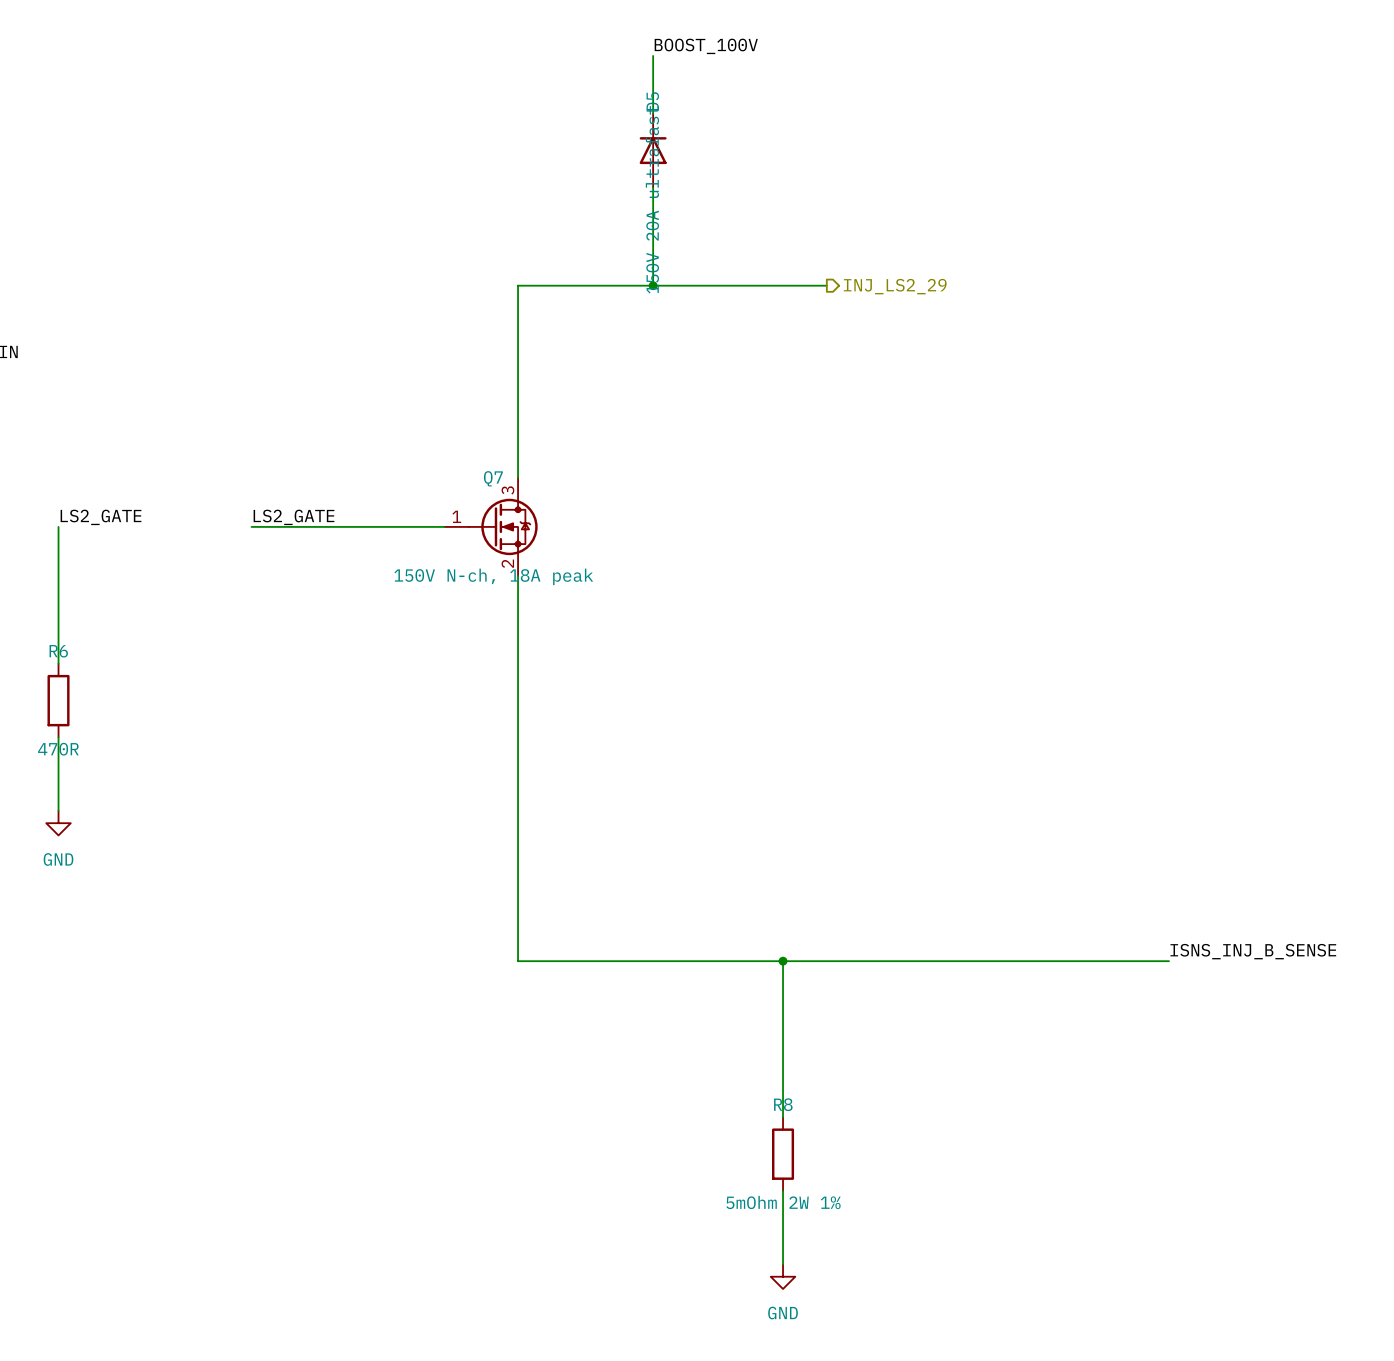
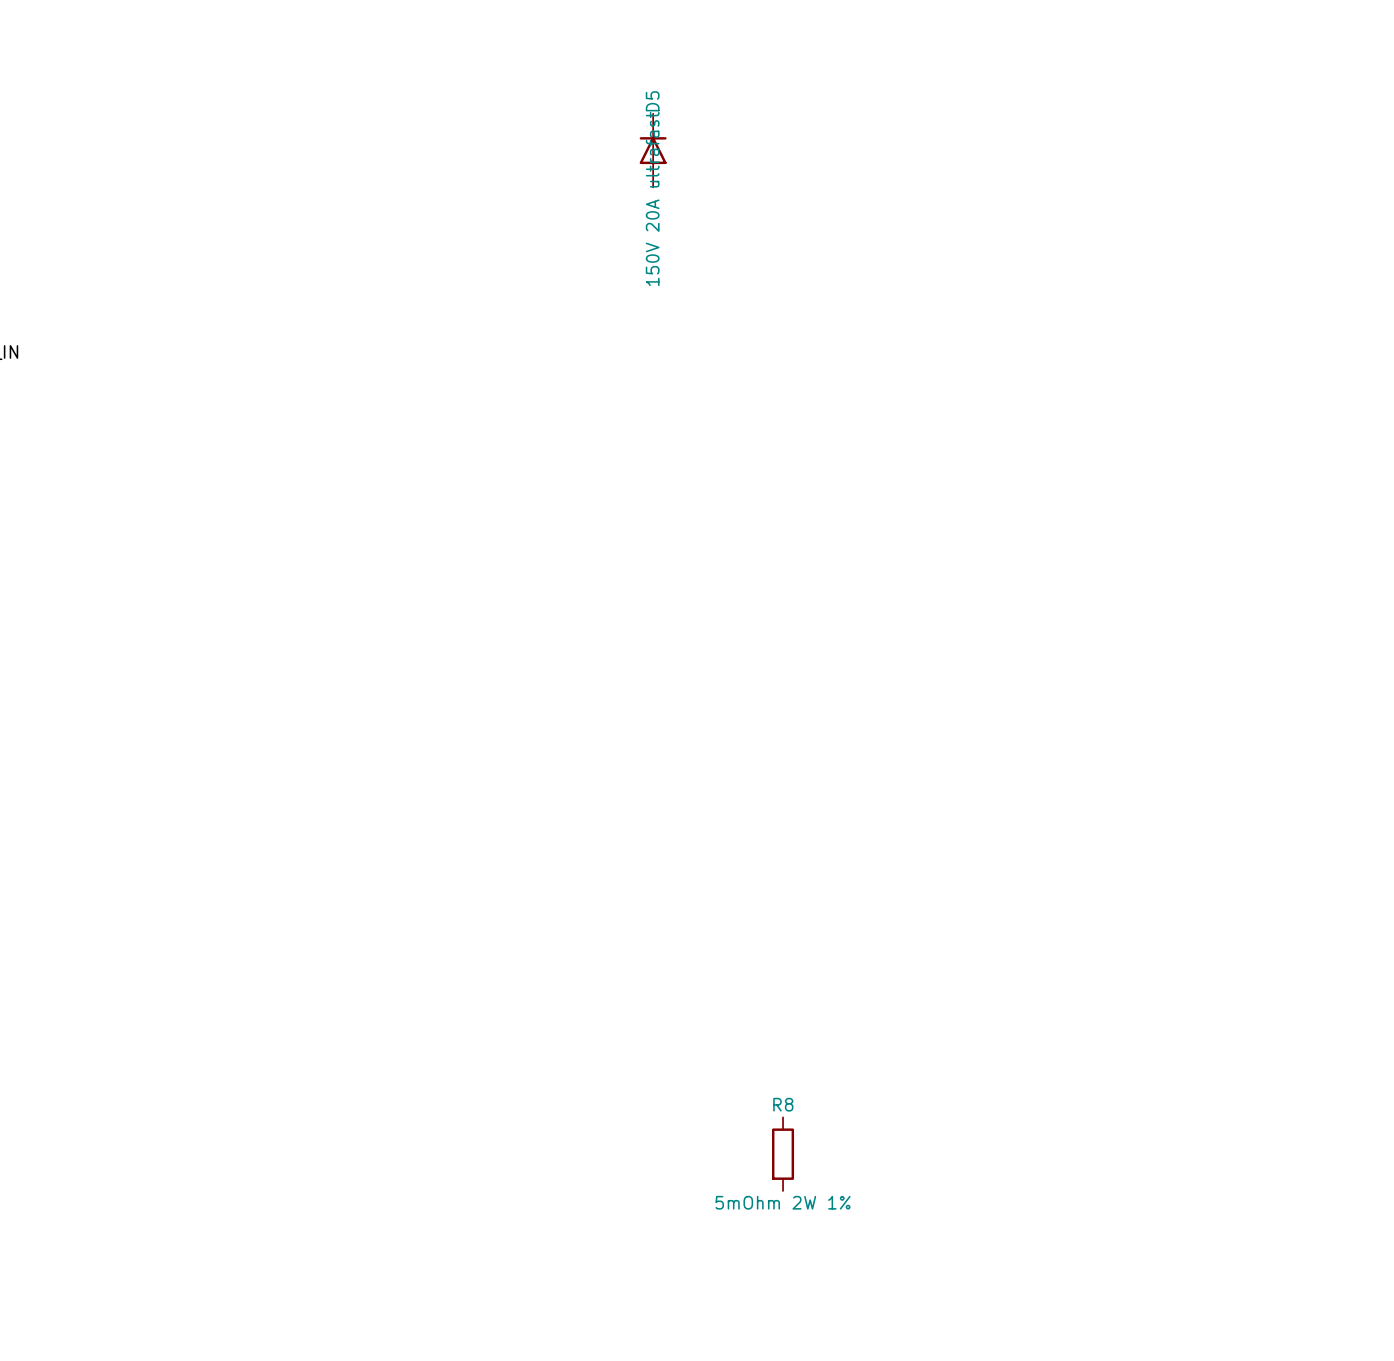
label: BOOST_100V (706, 46) -> none
wire: (653, 55) (653, 113) -> none
wire: (653, 187) (653, 285) -> none
junction: (653, 285) -> none
wire: (826, 285) (518, 285) (518, 477) -> none
hierarchical label: INJ_LS2_29 (895, 286) -> none
label: LS2_GATE (101, 517) -> none
label: LS2_GATE (294, 517) -> none
wire: (58, 526) (58, 663) -> none
wire: (251, 526) (444, 526) -> none
Q7: 150V N-ch, 18A peak (491, 526) -> none
wire: (518, 575) (518, 961) (1169, 961) -> none
R6: 470R (58, 700) -> none
wire: (58, 737) (58, 810) -> none
power symbol: GND (58, 823) -> none
label: ISNS_INJ_B_SENSE (1253, 951) -> none
wire: (783, 961) (783, 1117) -> none
junction: (783, 961) -> none
wire: (783, 1190) (783, 1264) -> none
power symbol: GND (783, 1276) -> none

